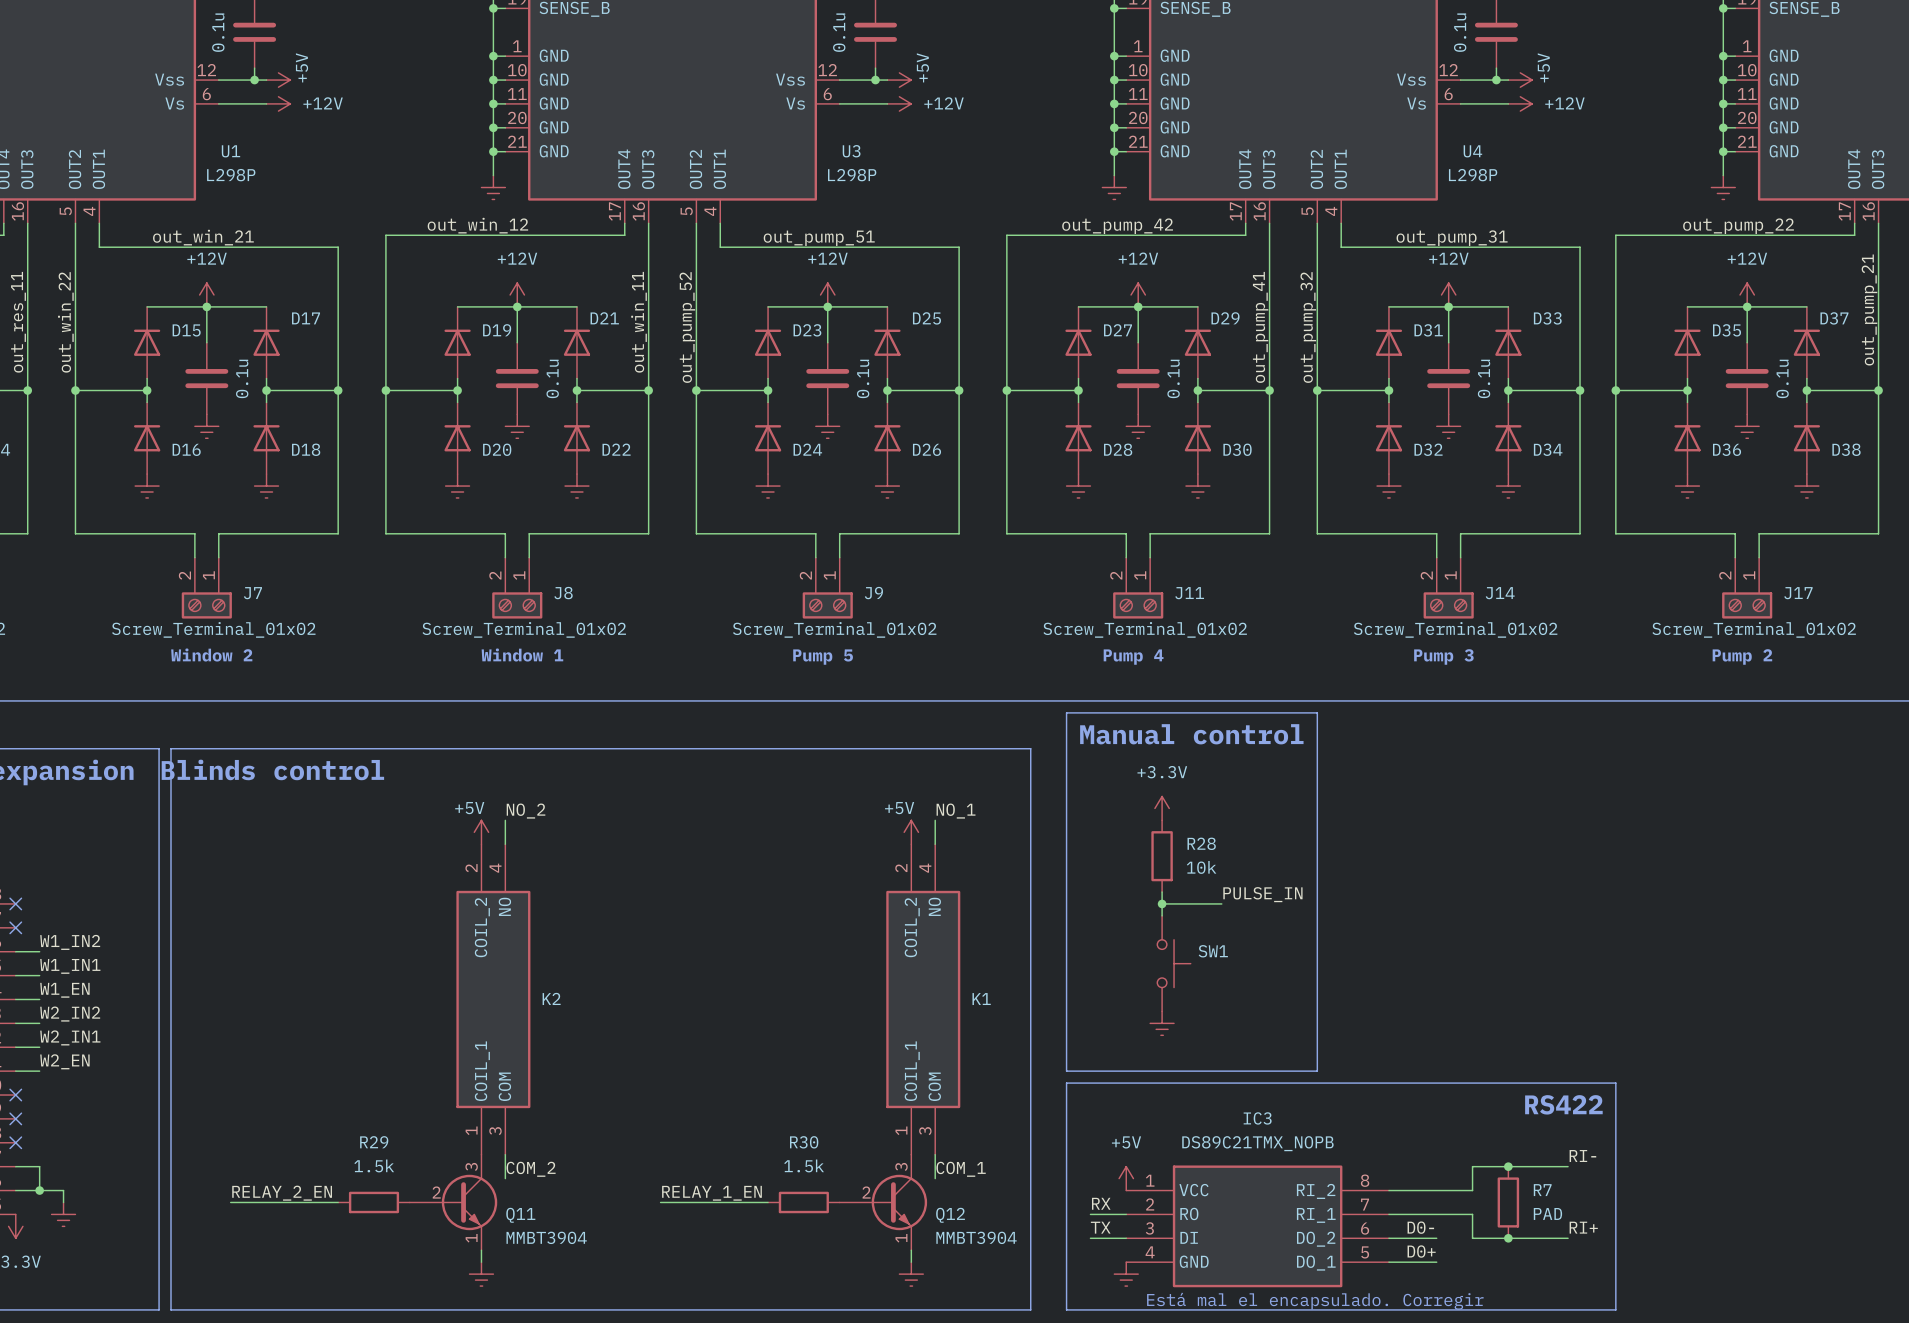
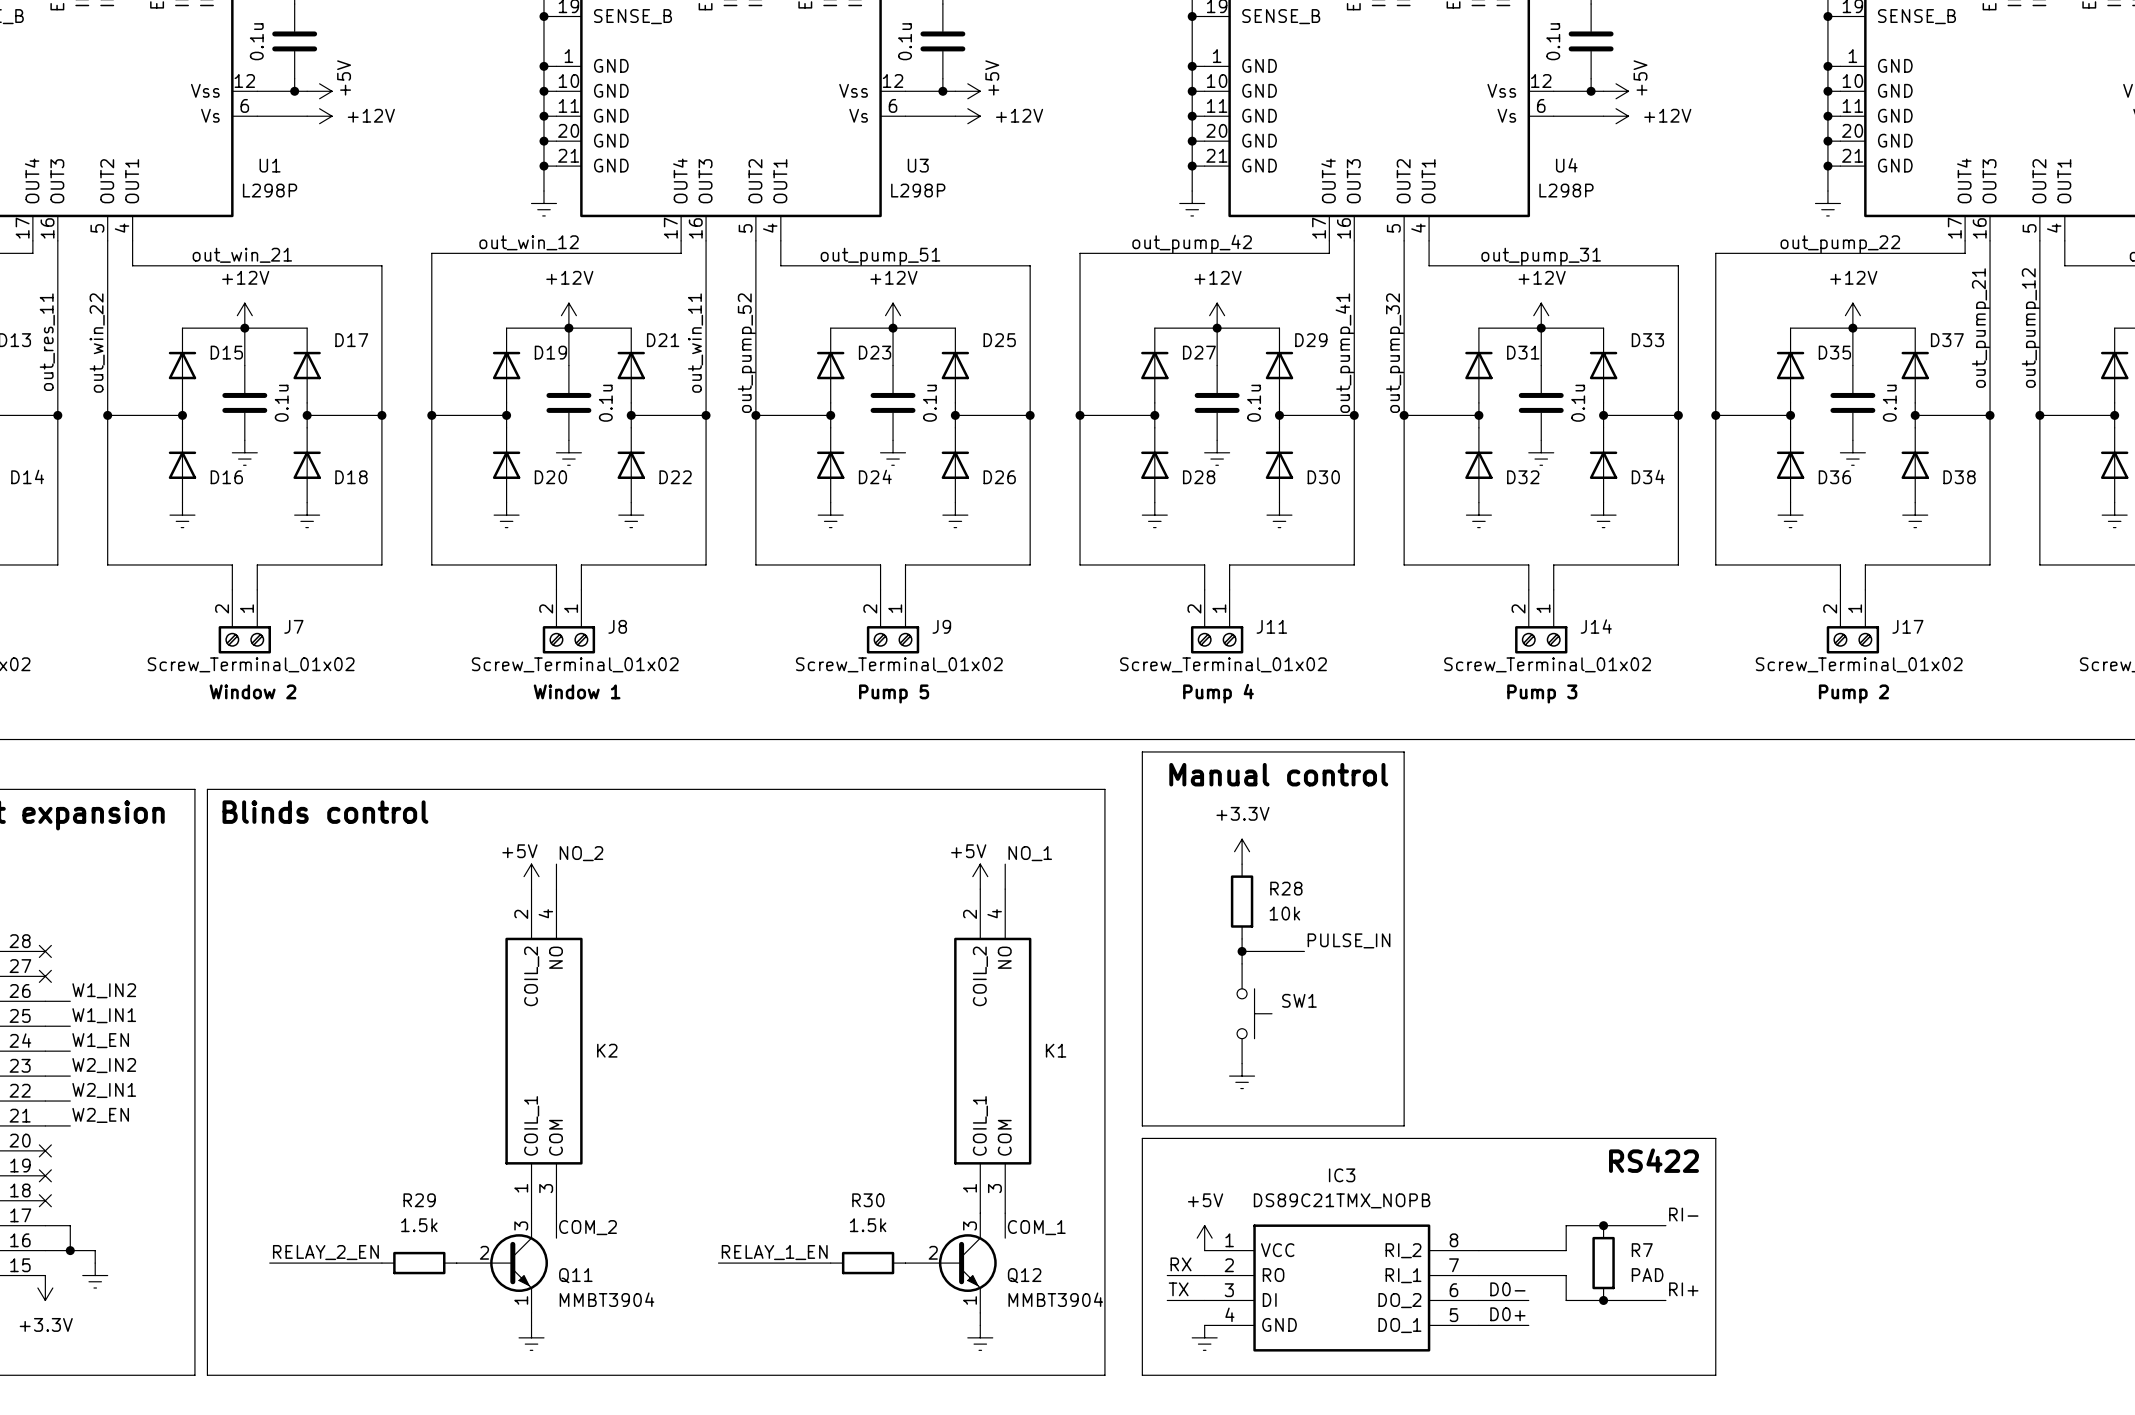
text: Está mal el encapsulado. Corregir (1315, 1301) -> none

